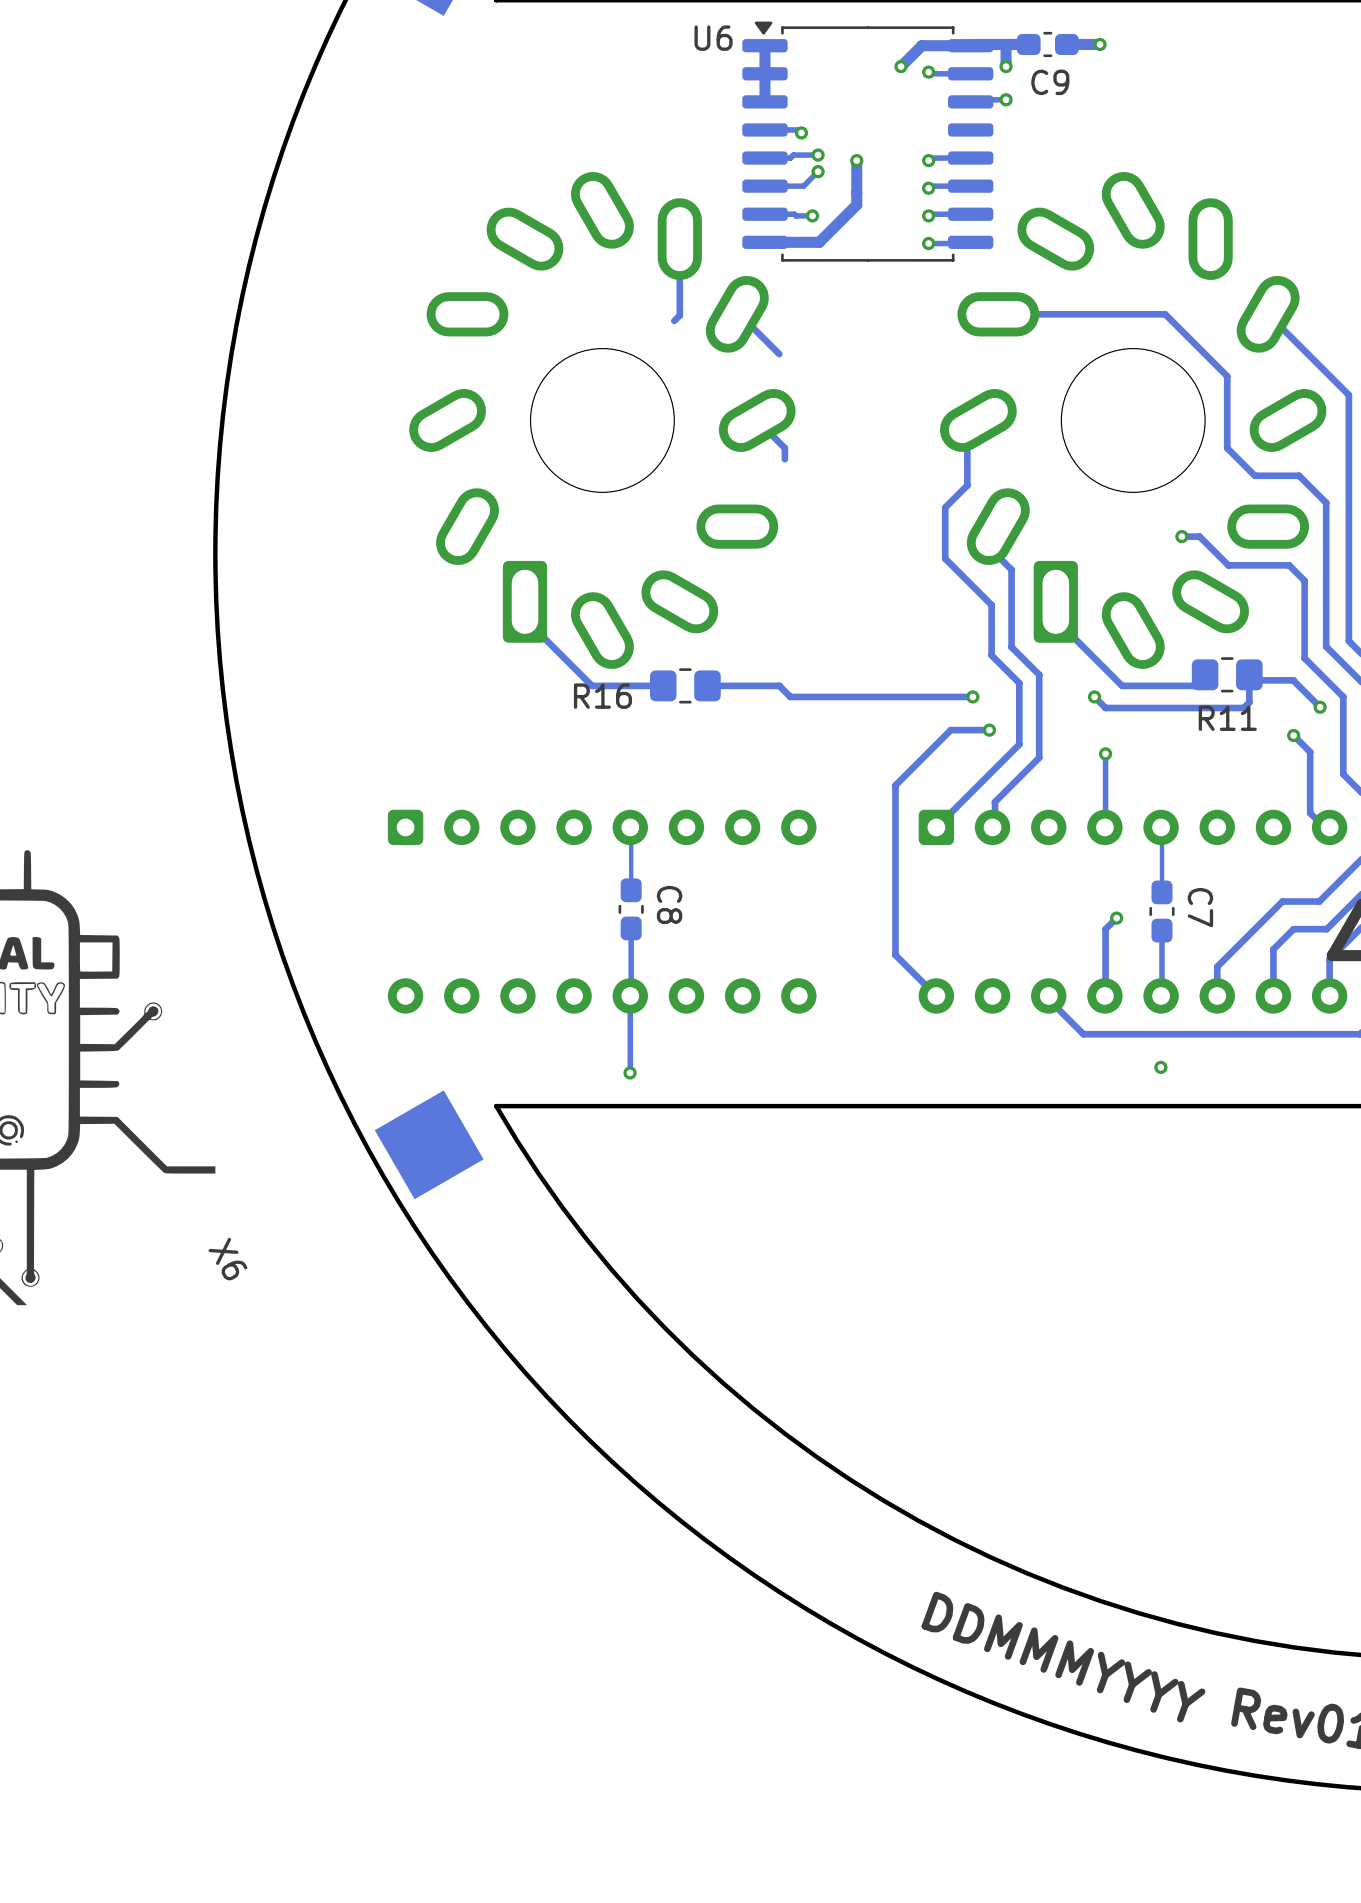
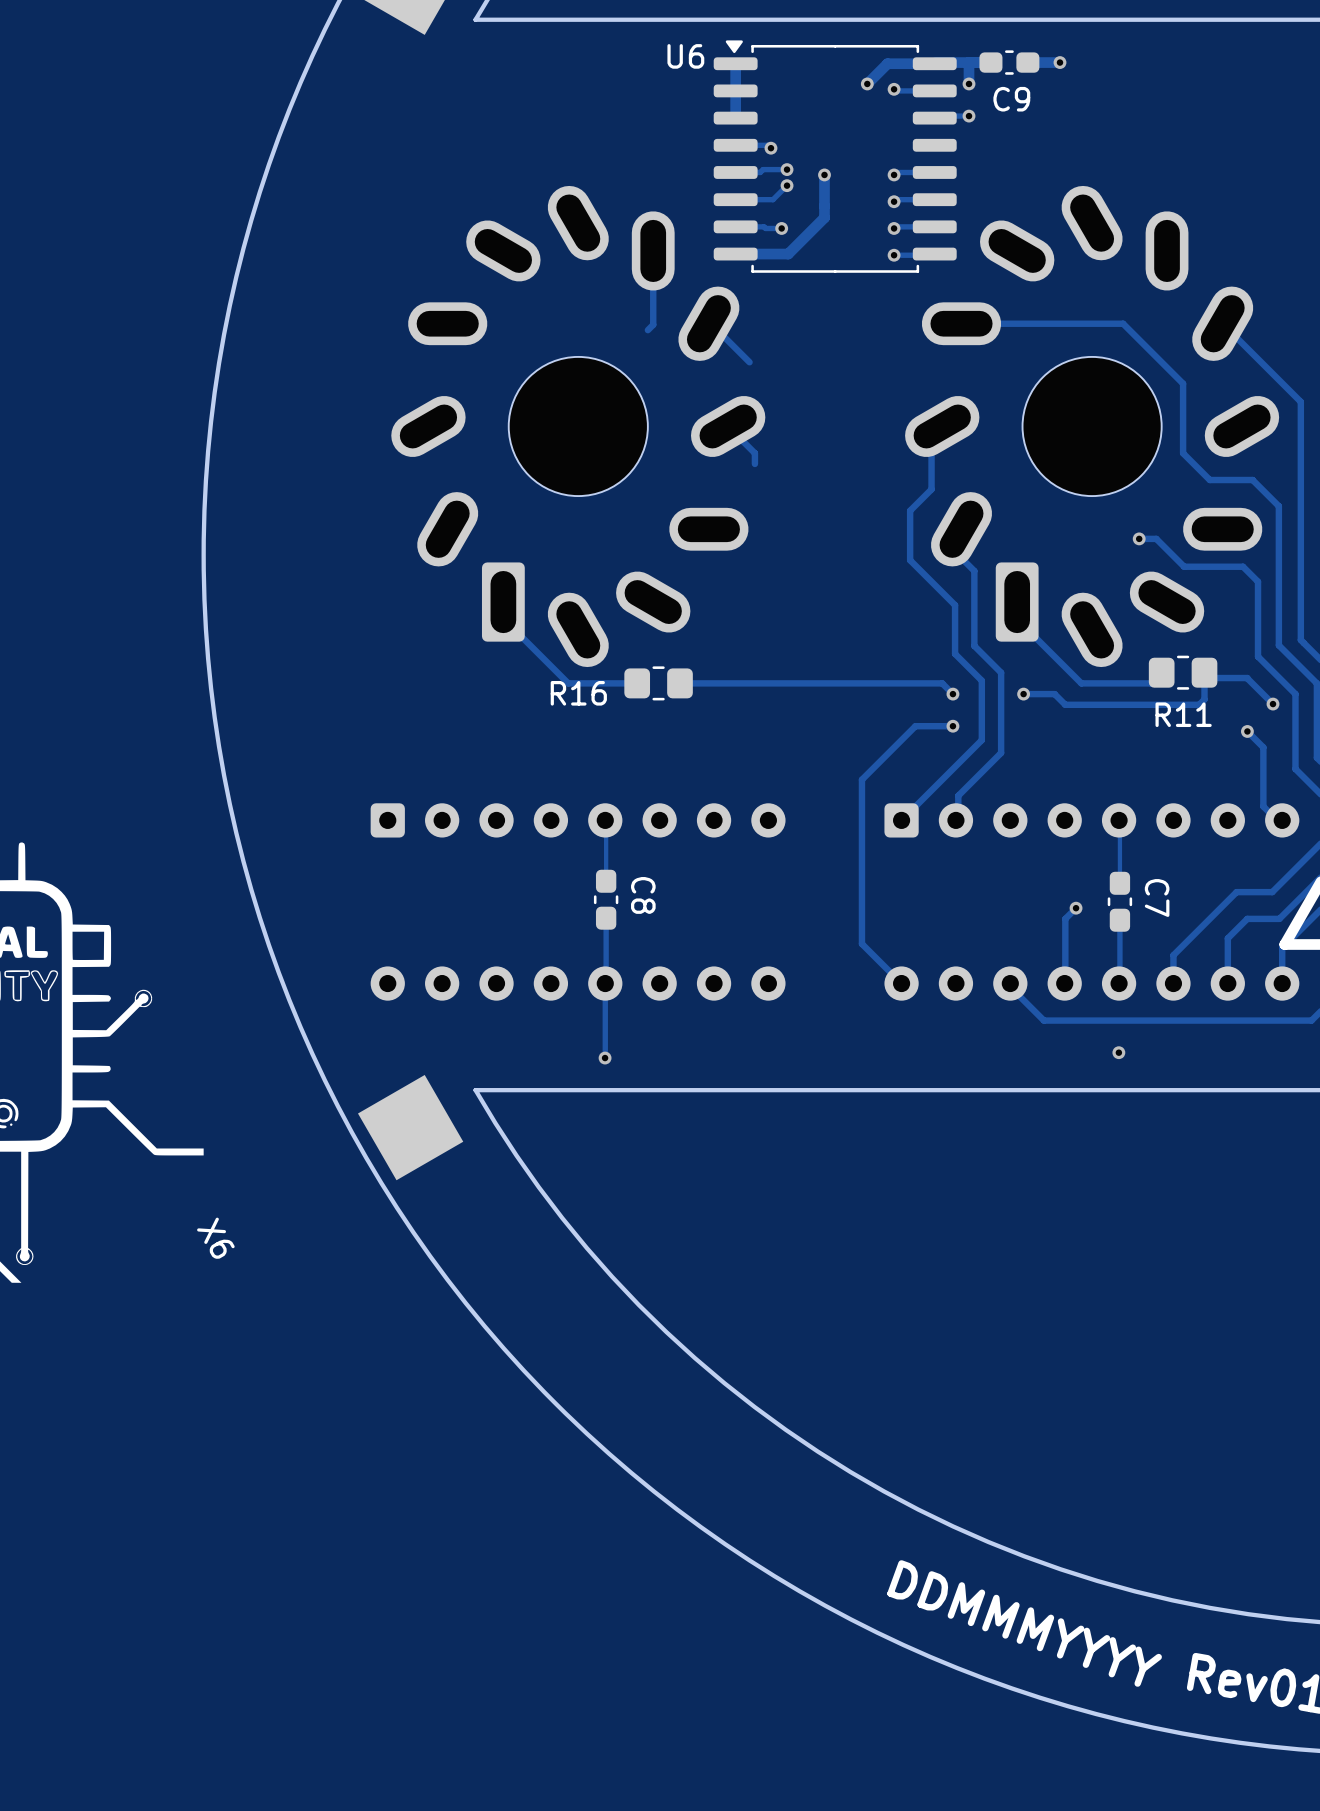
track: (779, 685) (790, 696) (972, 696) -> (749, 683) (942, 683) (952, 694)
via position: (972, 696) -> (952, 694)
track: none -> (1054, 694) (1023, 694)
via position: (1094, 696) -> (1023, 694)
track: (1105, 753) (1105, 826) -> none
via: (1105, 753) -> none

